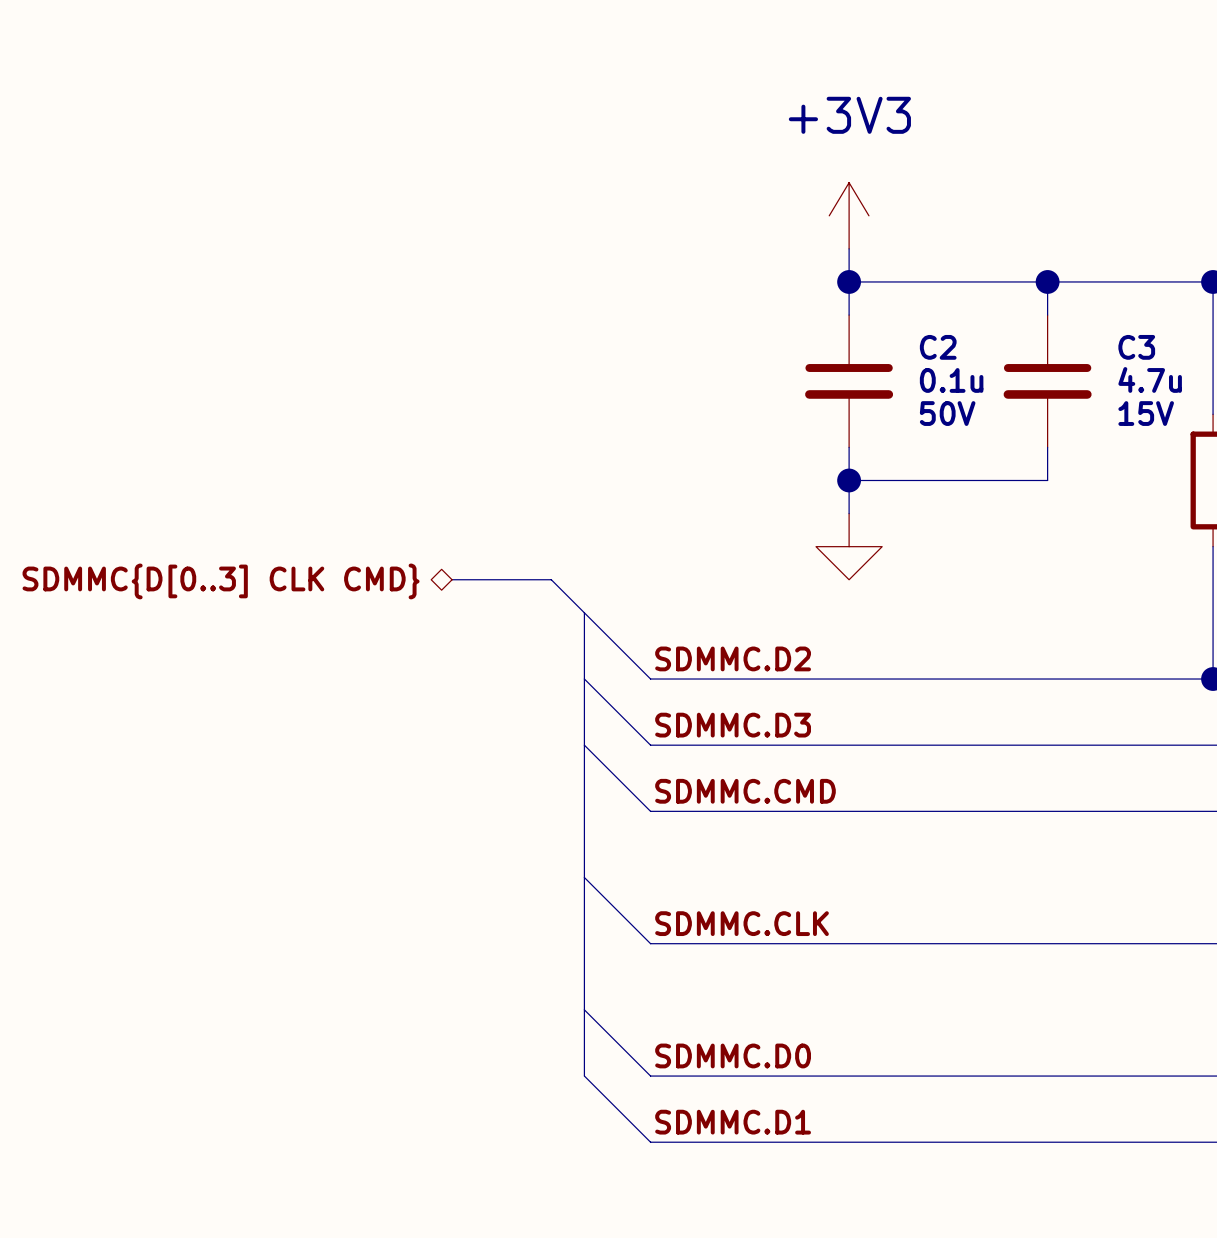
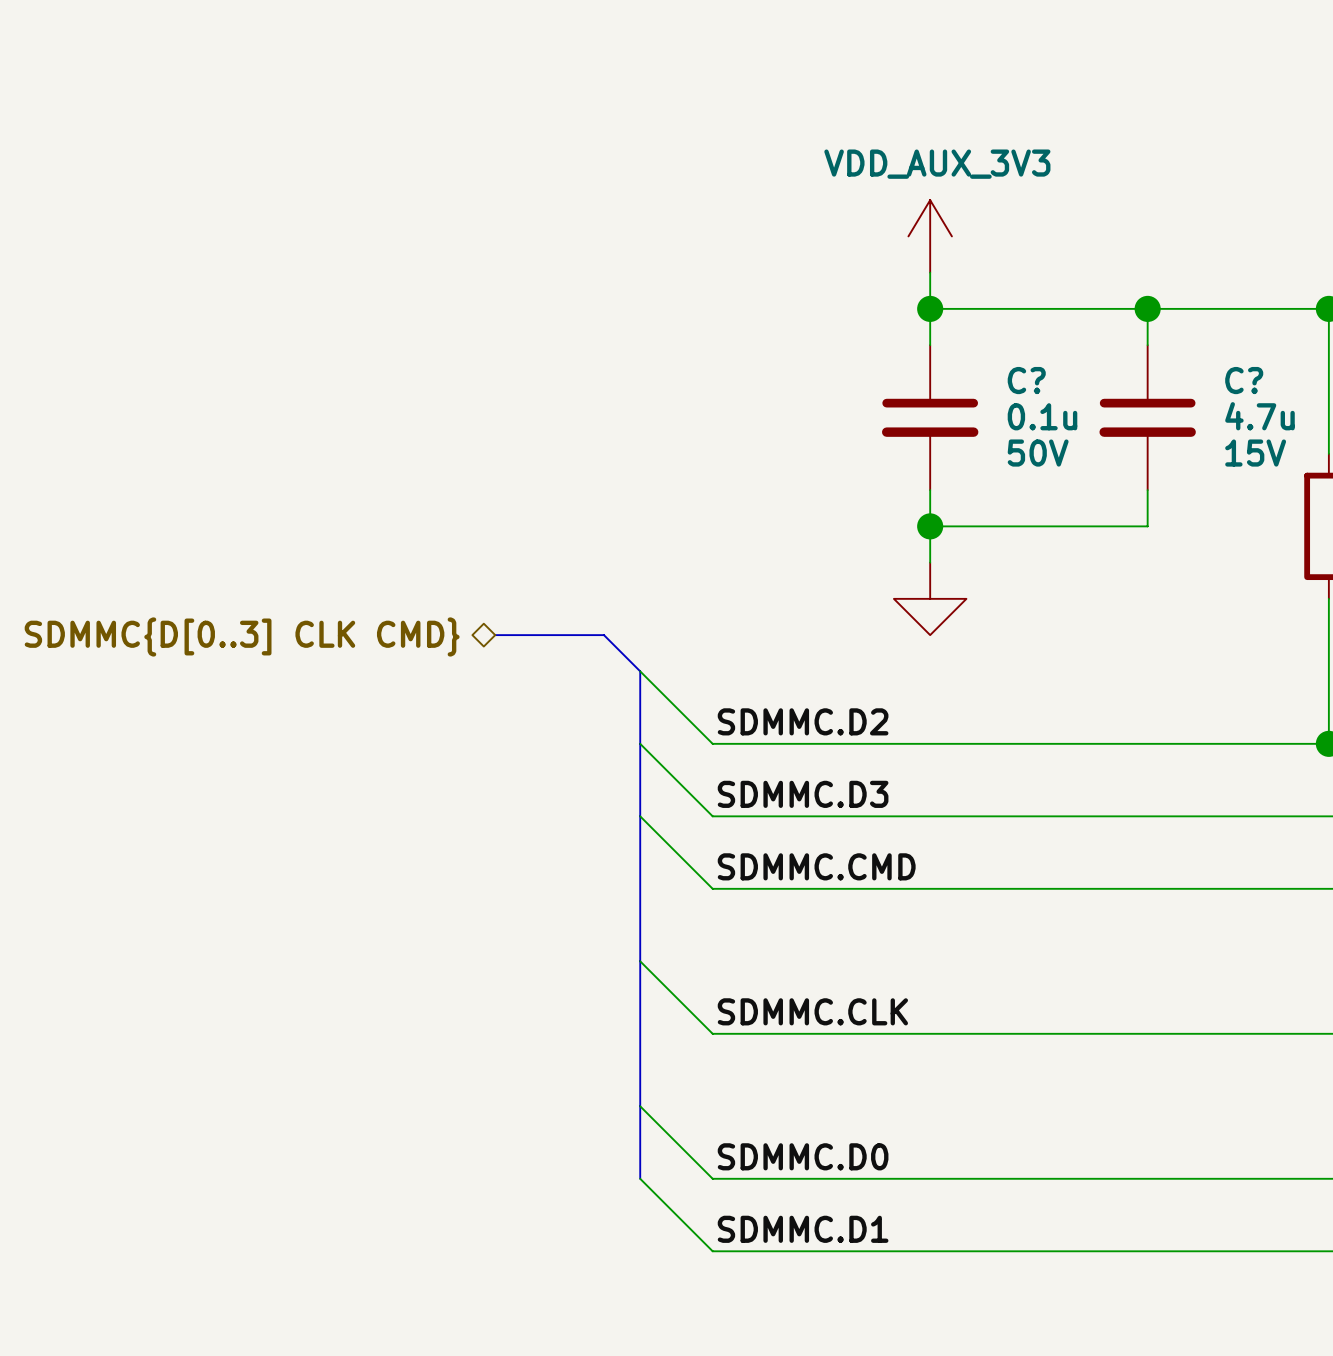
power symbol: +3V3 (849, 215) -> VDD_AUX_3V3 (930, 236)
C2 name: C2 (938, 347) -> C? (1026, 380)
C3 name: C3 (1136, 347) -> C? (1244, 380)

